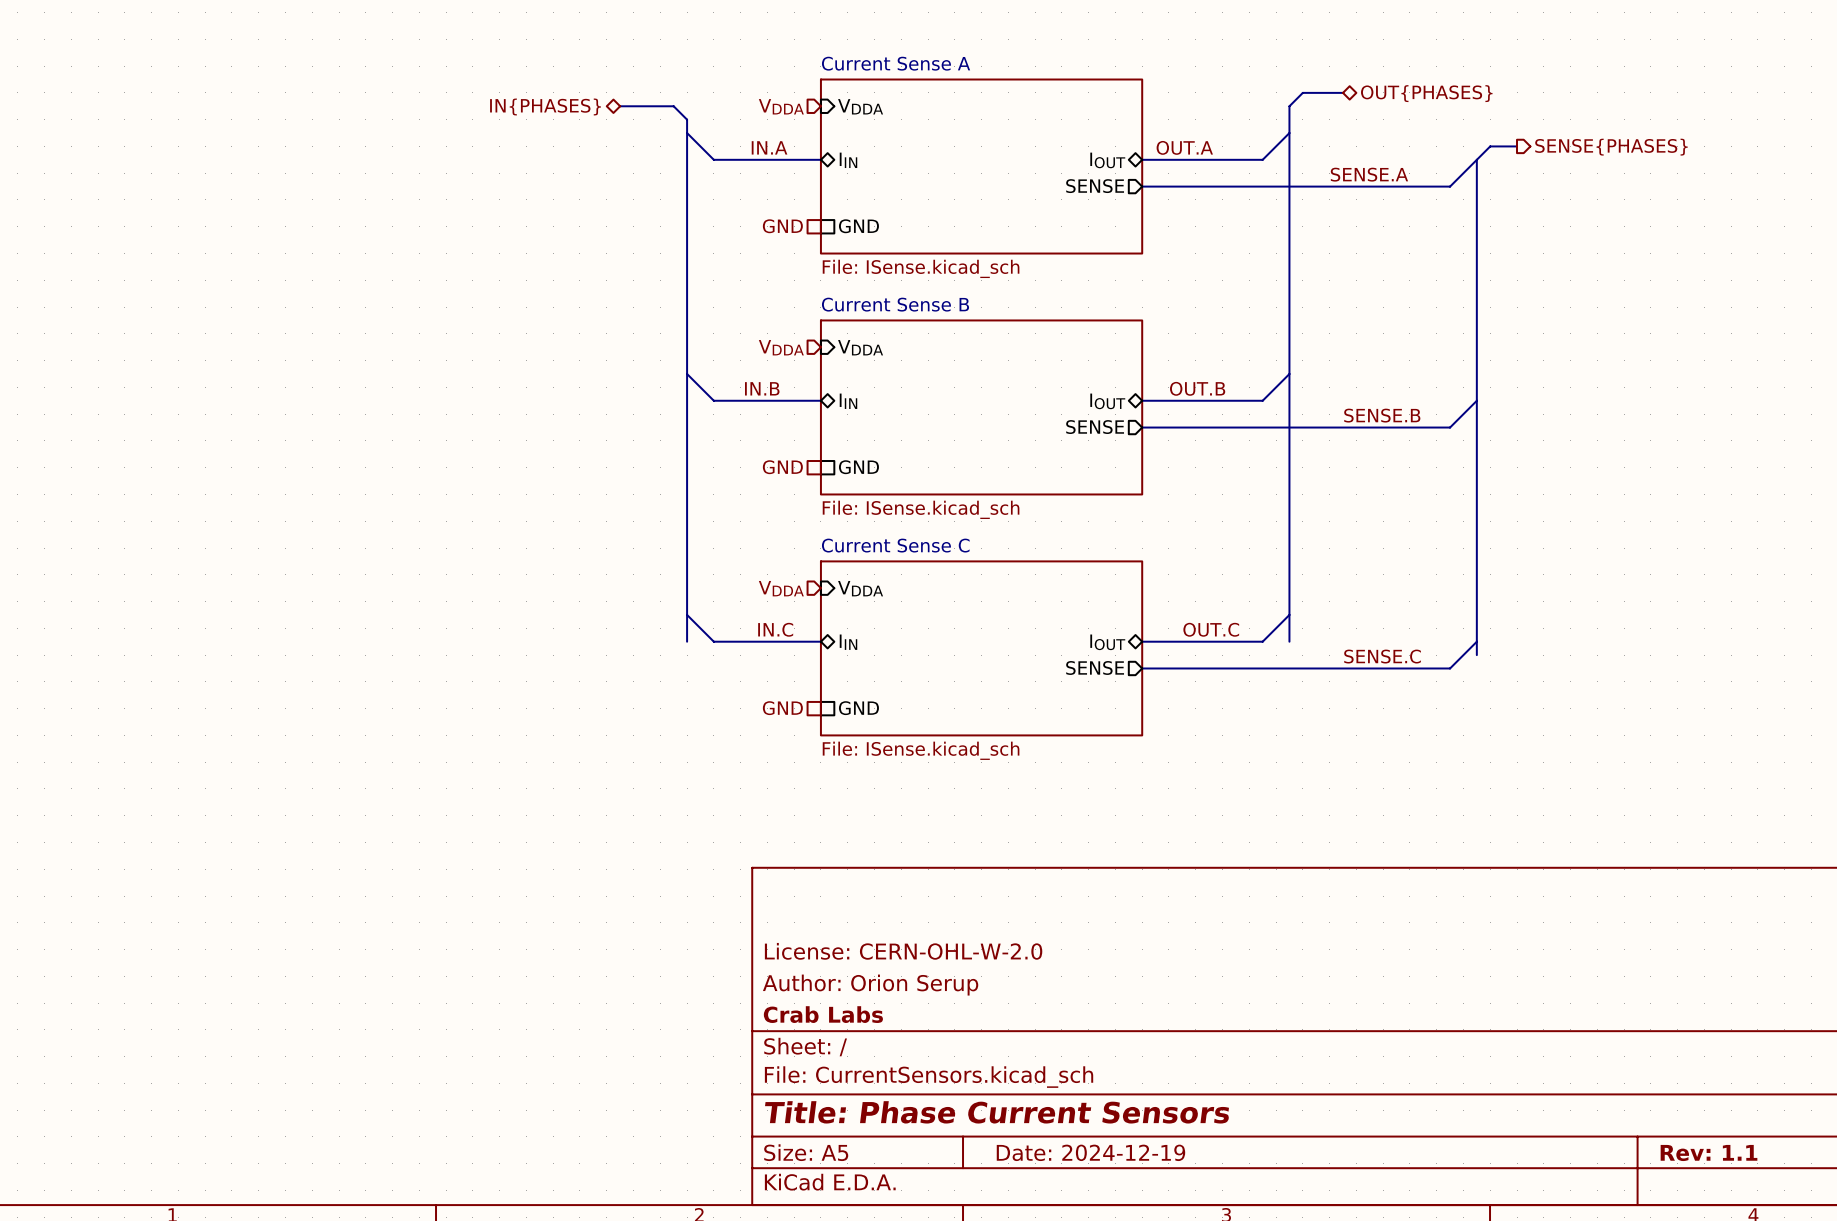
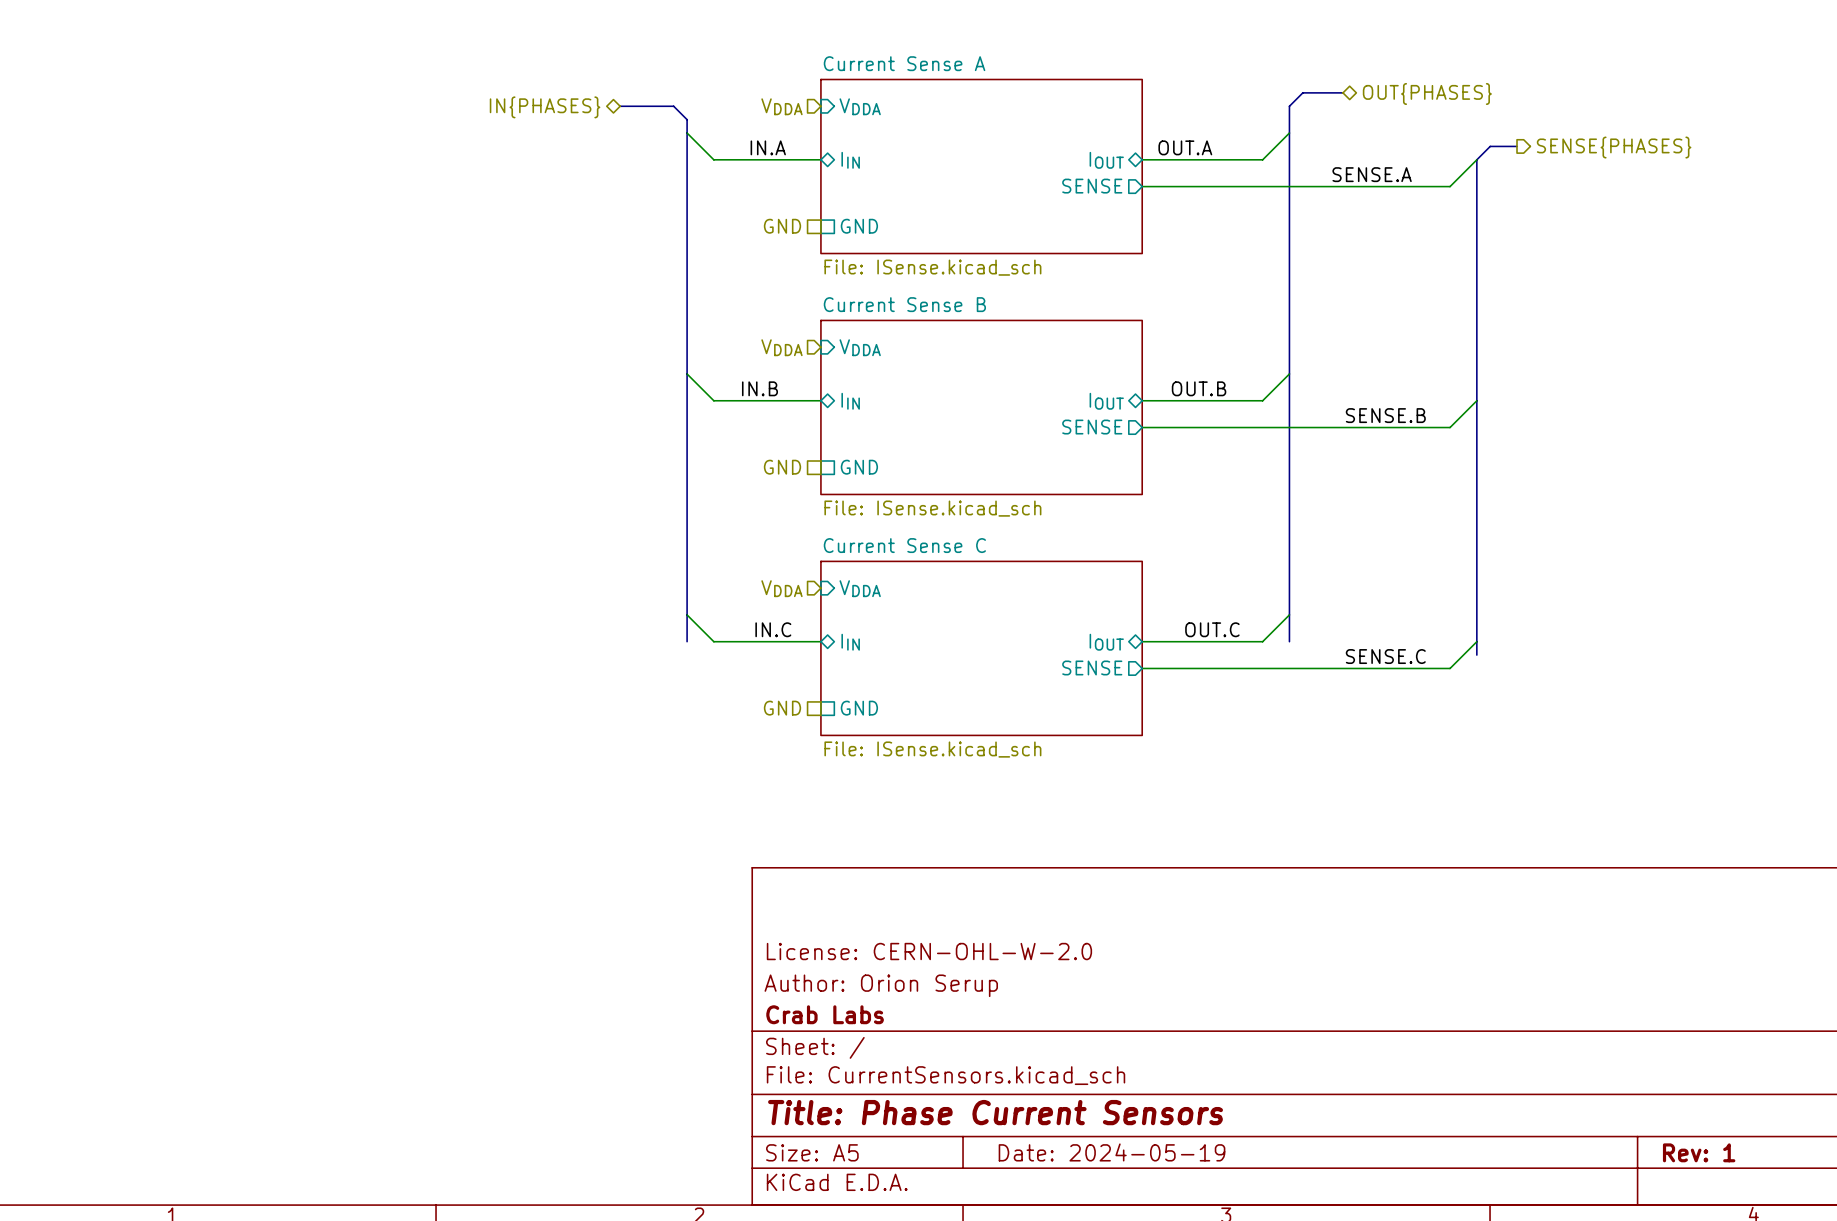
title block: Date: 2024-12-19 (1090, 1152) -> Date: 2024-05-19 (1112, 1152)
title block: Rev: 1.1 (1709, 1152) -> Rev: 1 (1699, 1152)

